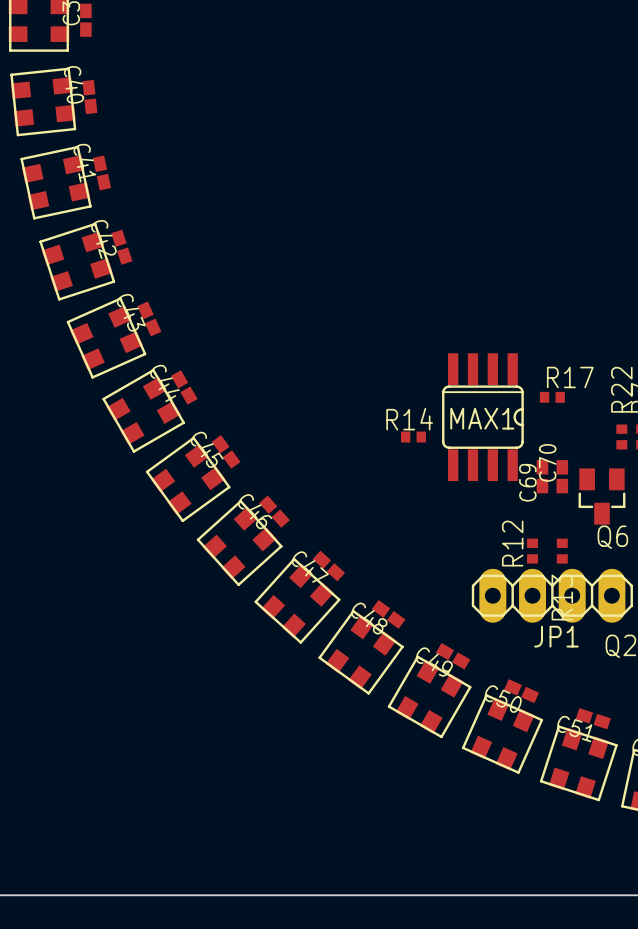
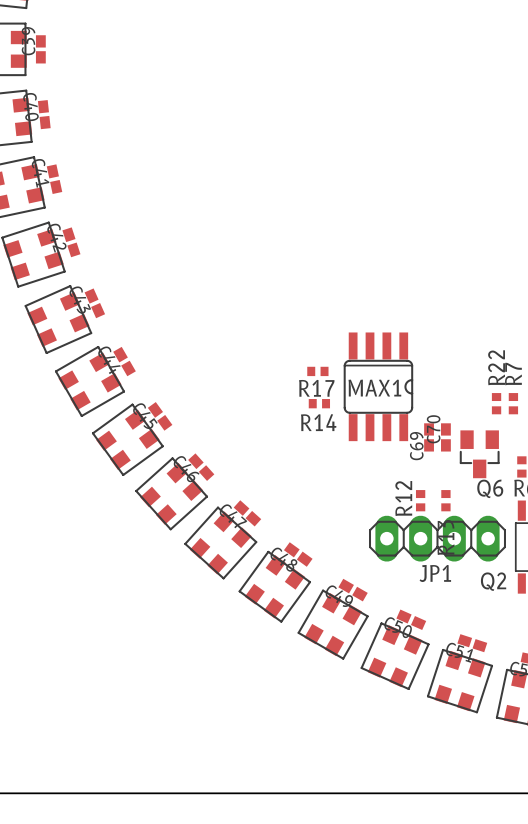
R17 name position: R17 (570, 377) -> R17 (316, 388)
R17 position: (552, 397) -> (317, 371)
R14 name position: R14 (409, 419) -> R14 (318, 422)

